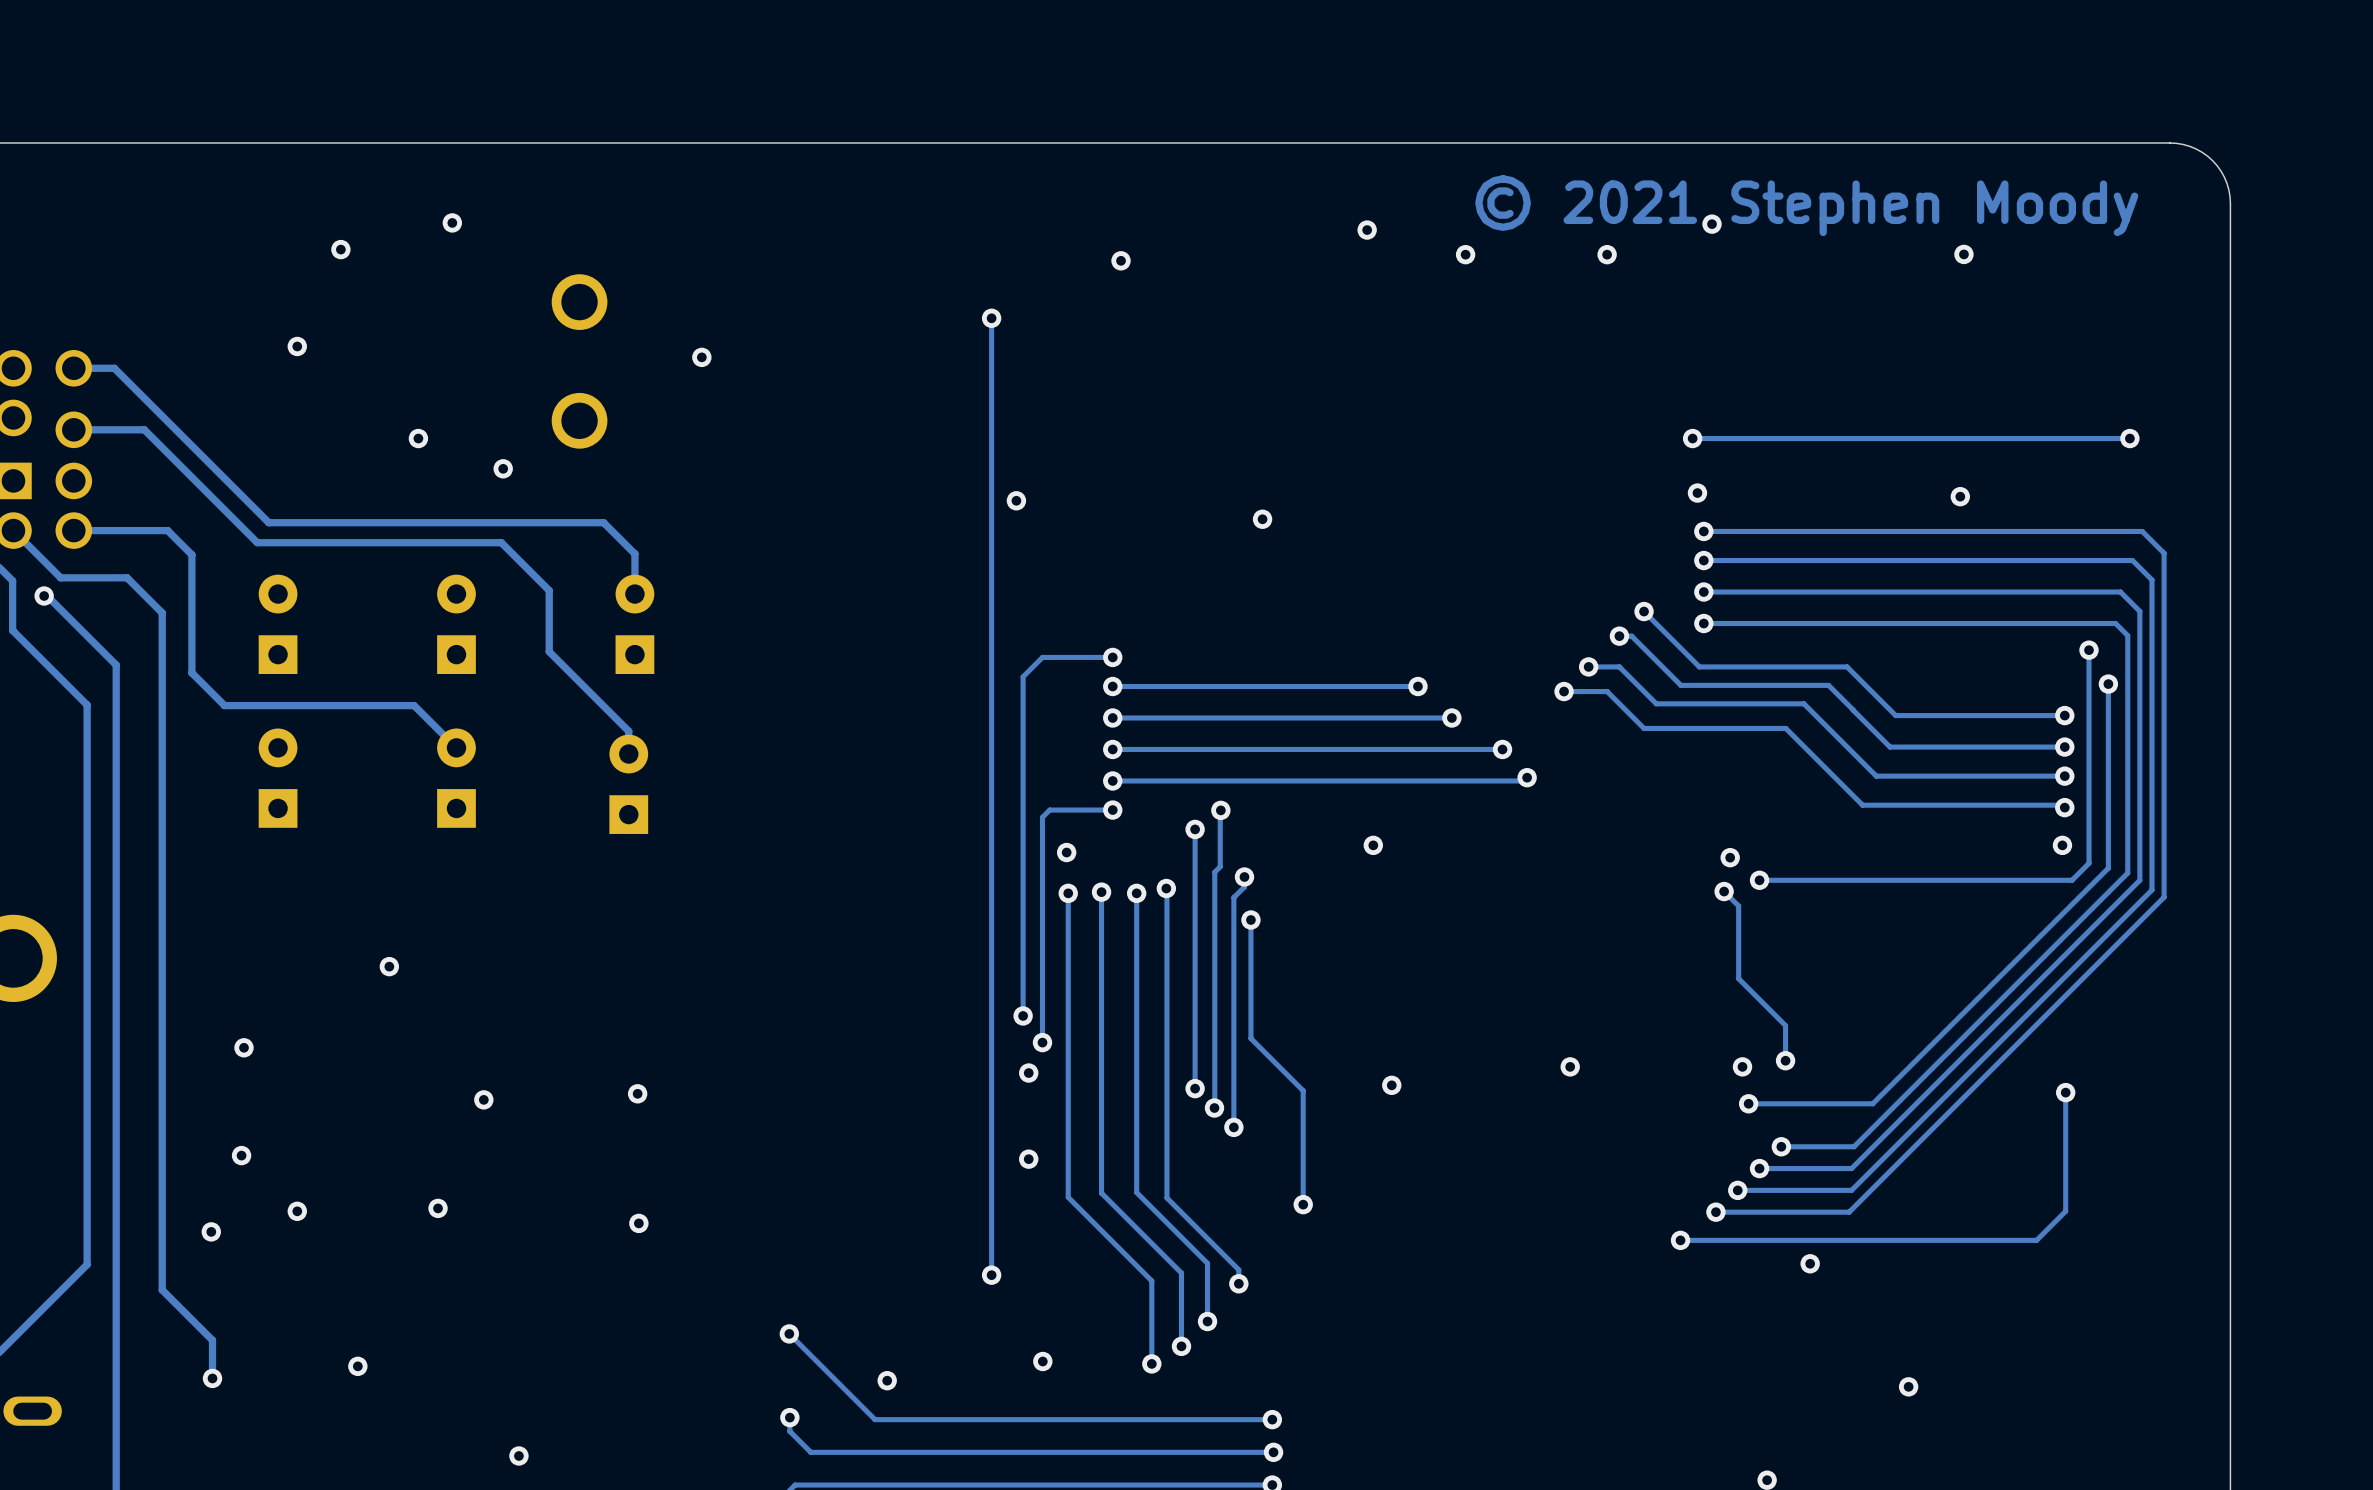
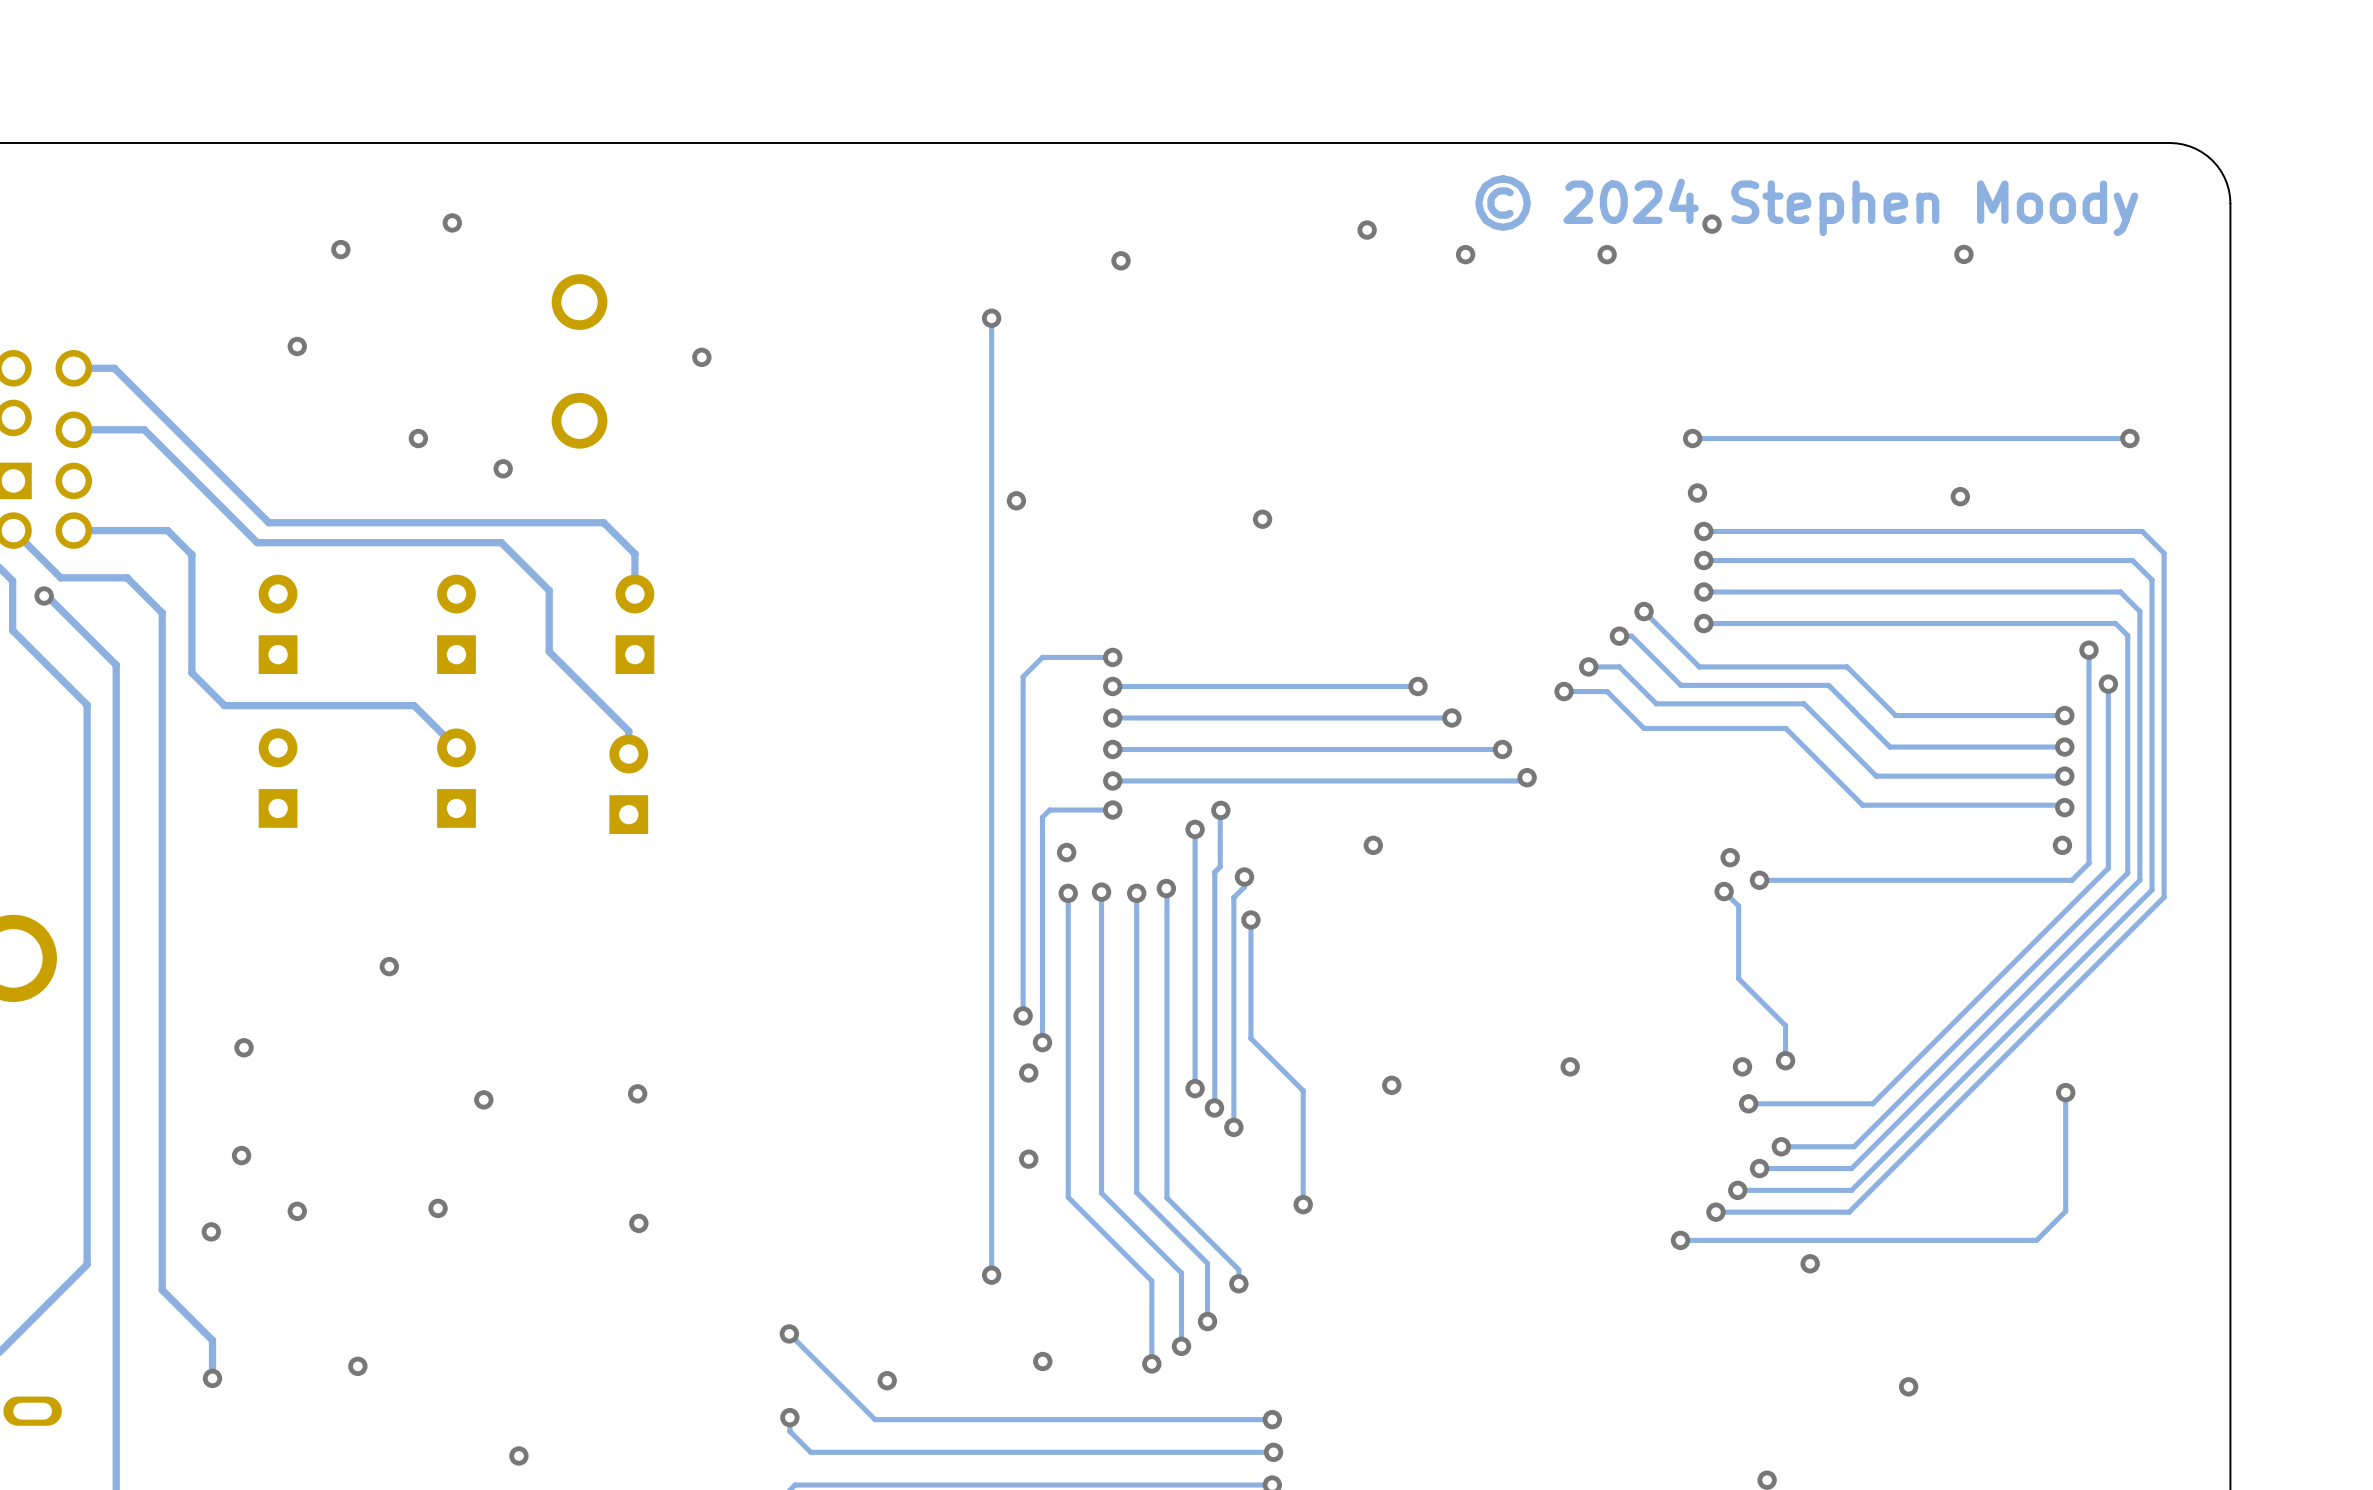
text: © 2021 Stephen Moody (1806, 205) -> © 2024 Stephen Moody (1806, 205)

